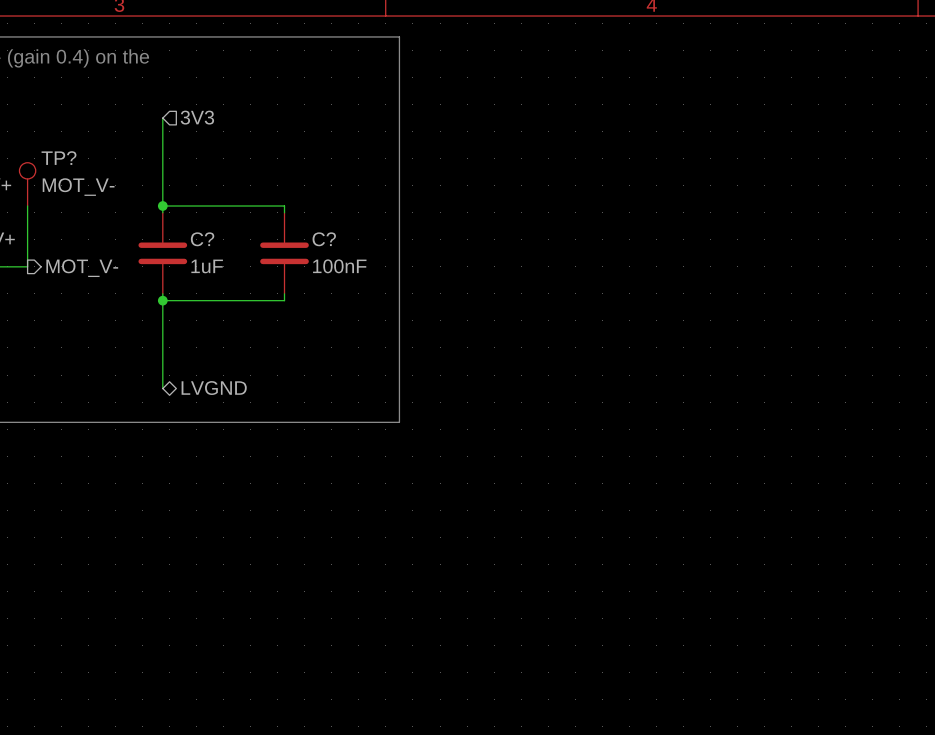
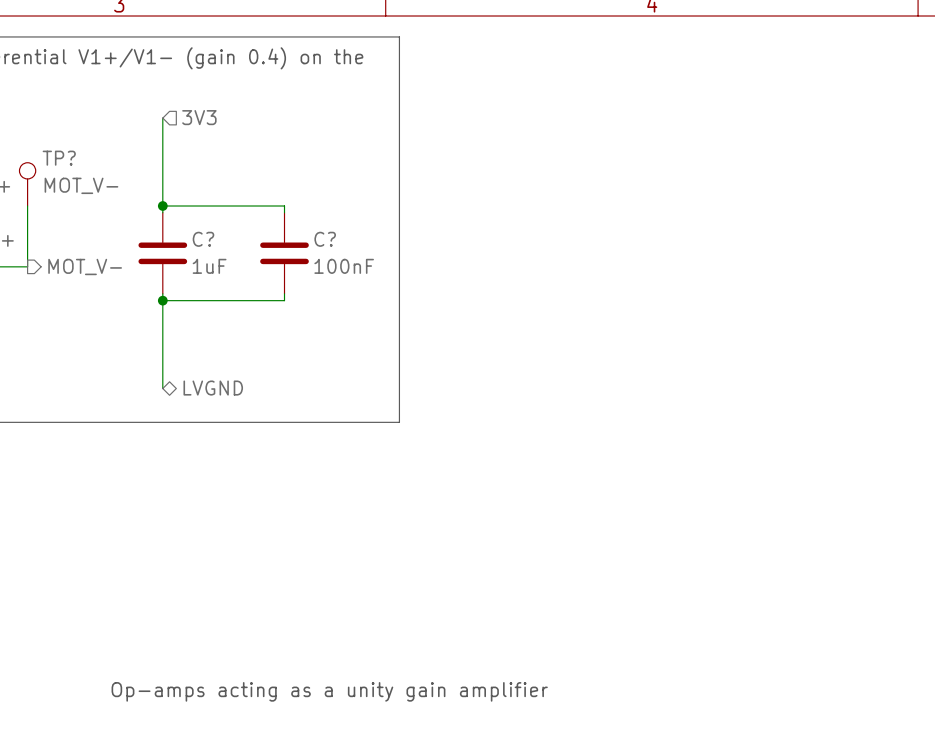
text: none -> Op-amps acting as a unity gain amplifier (329, 691)

